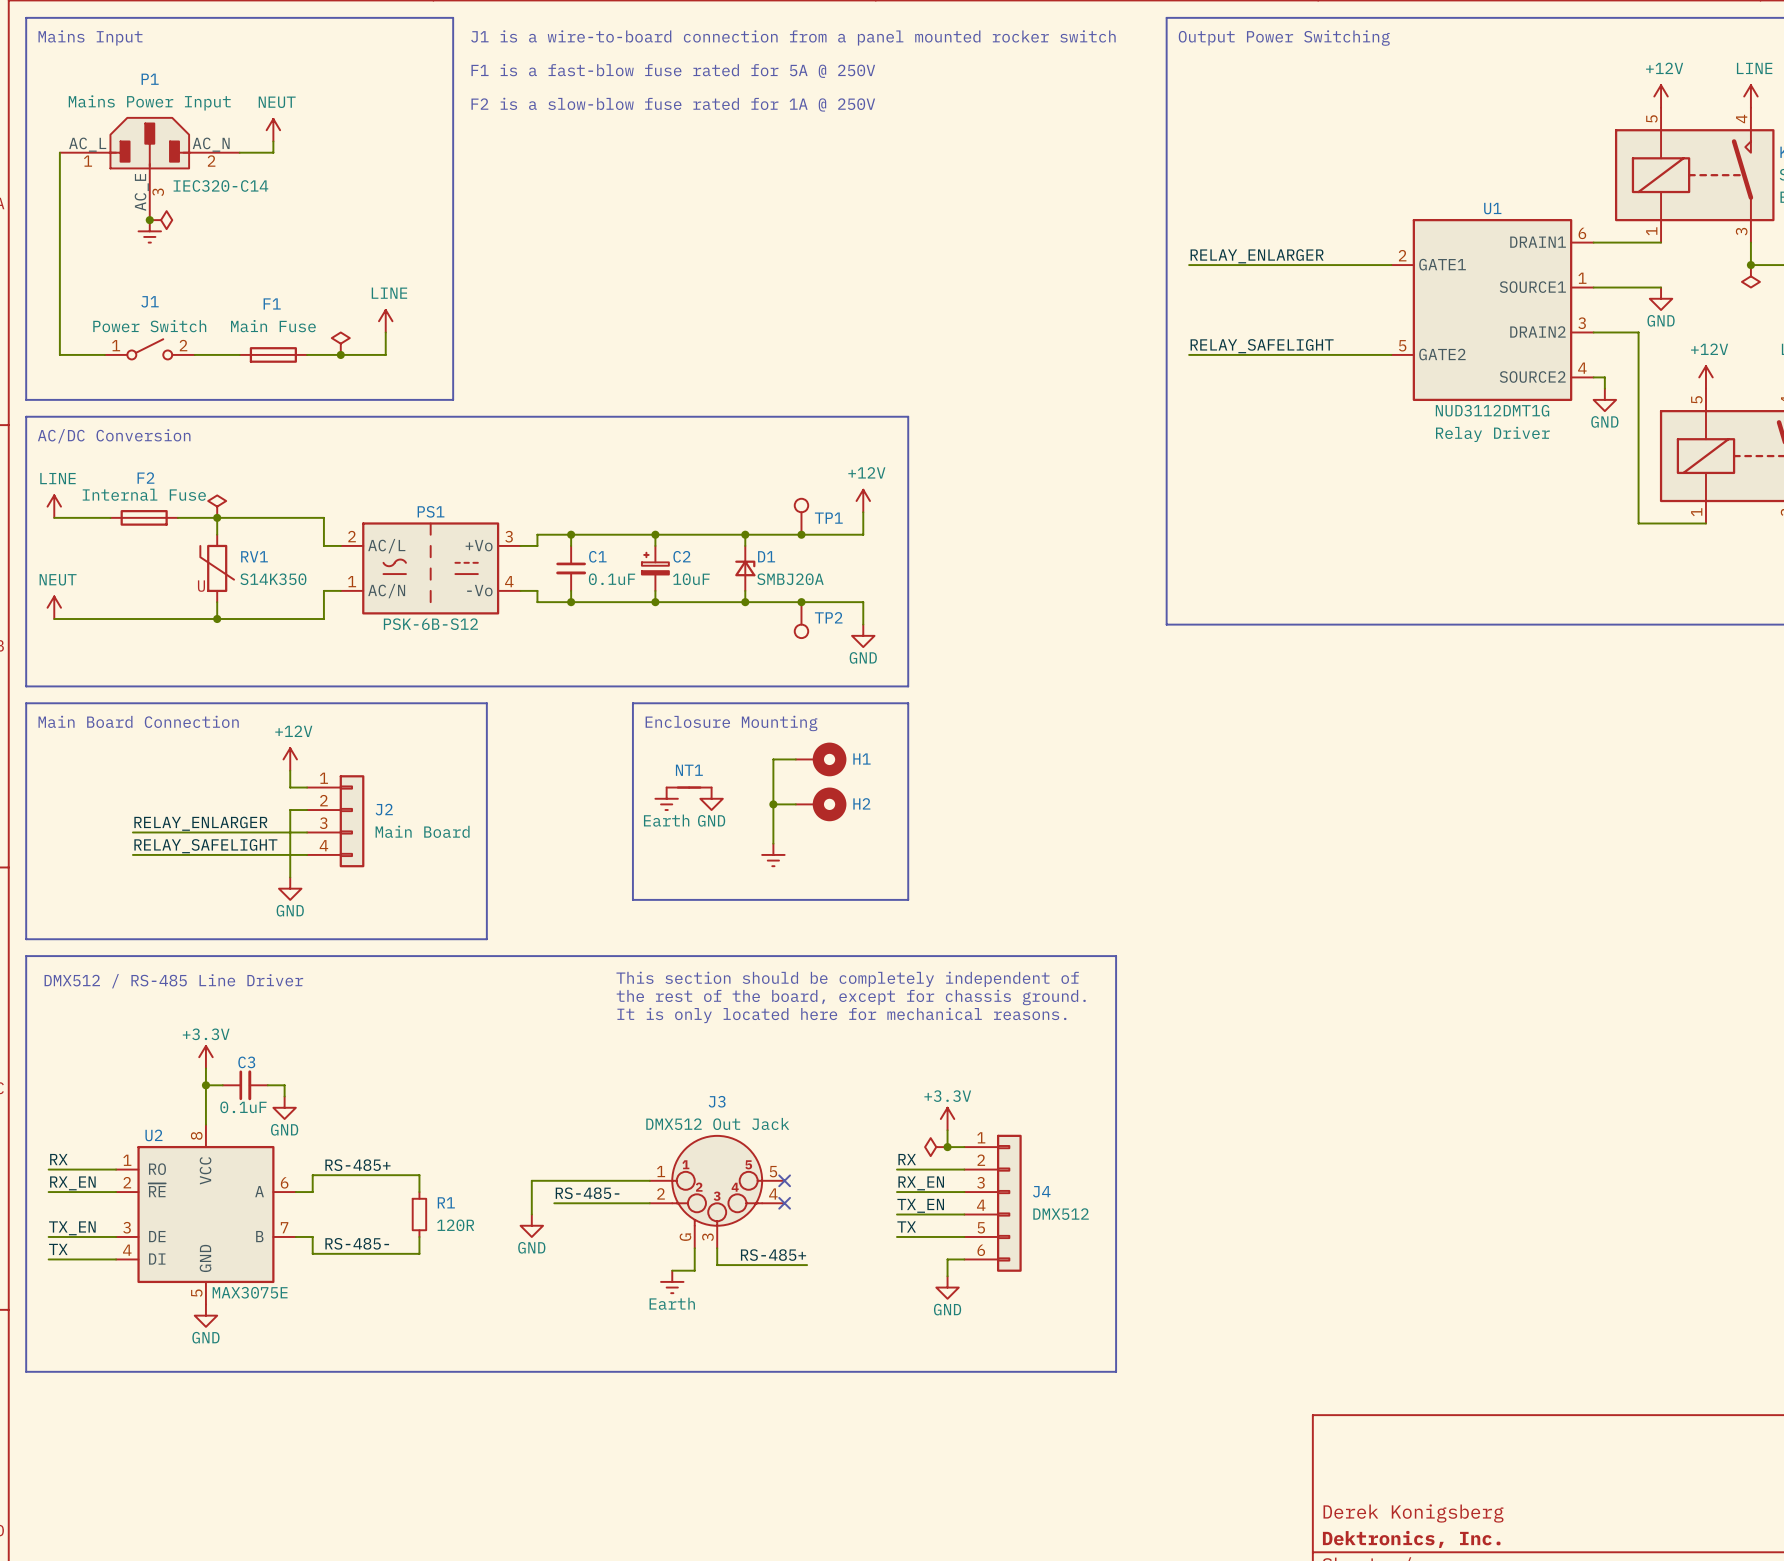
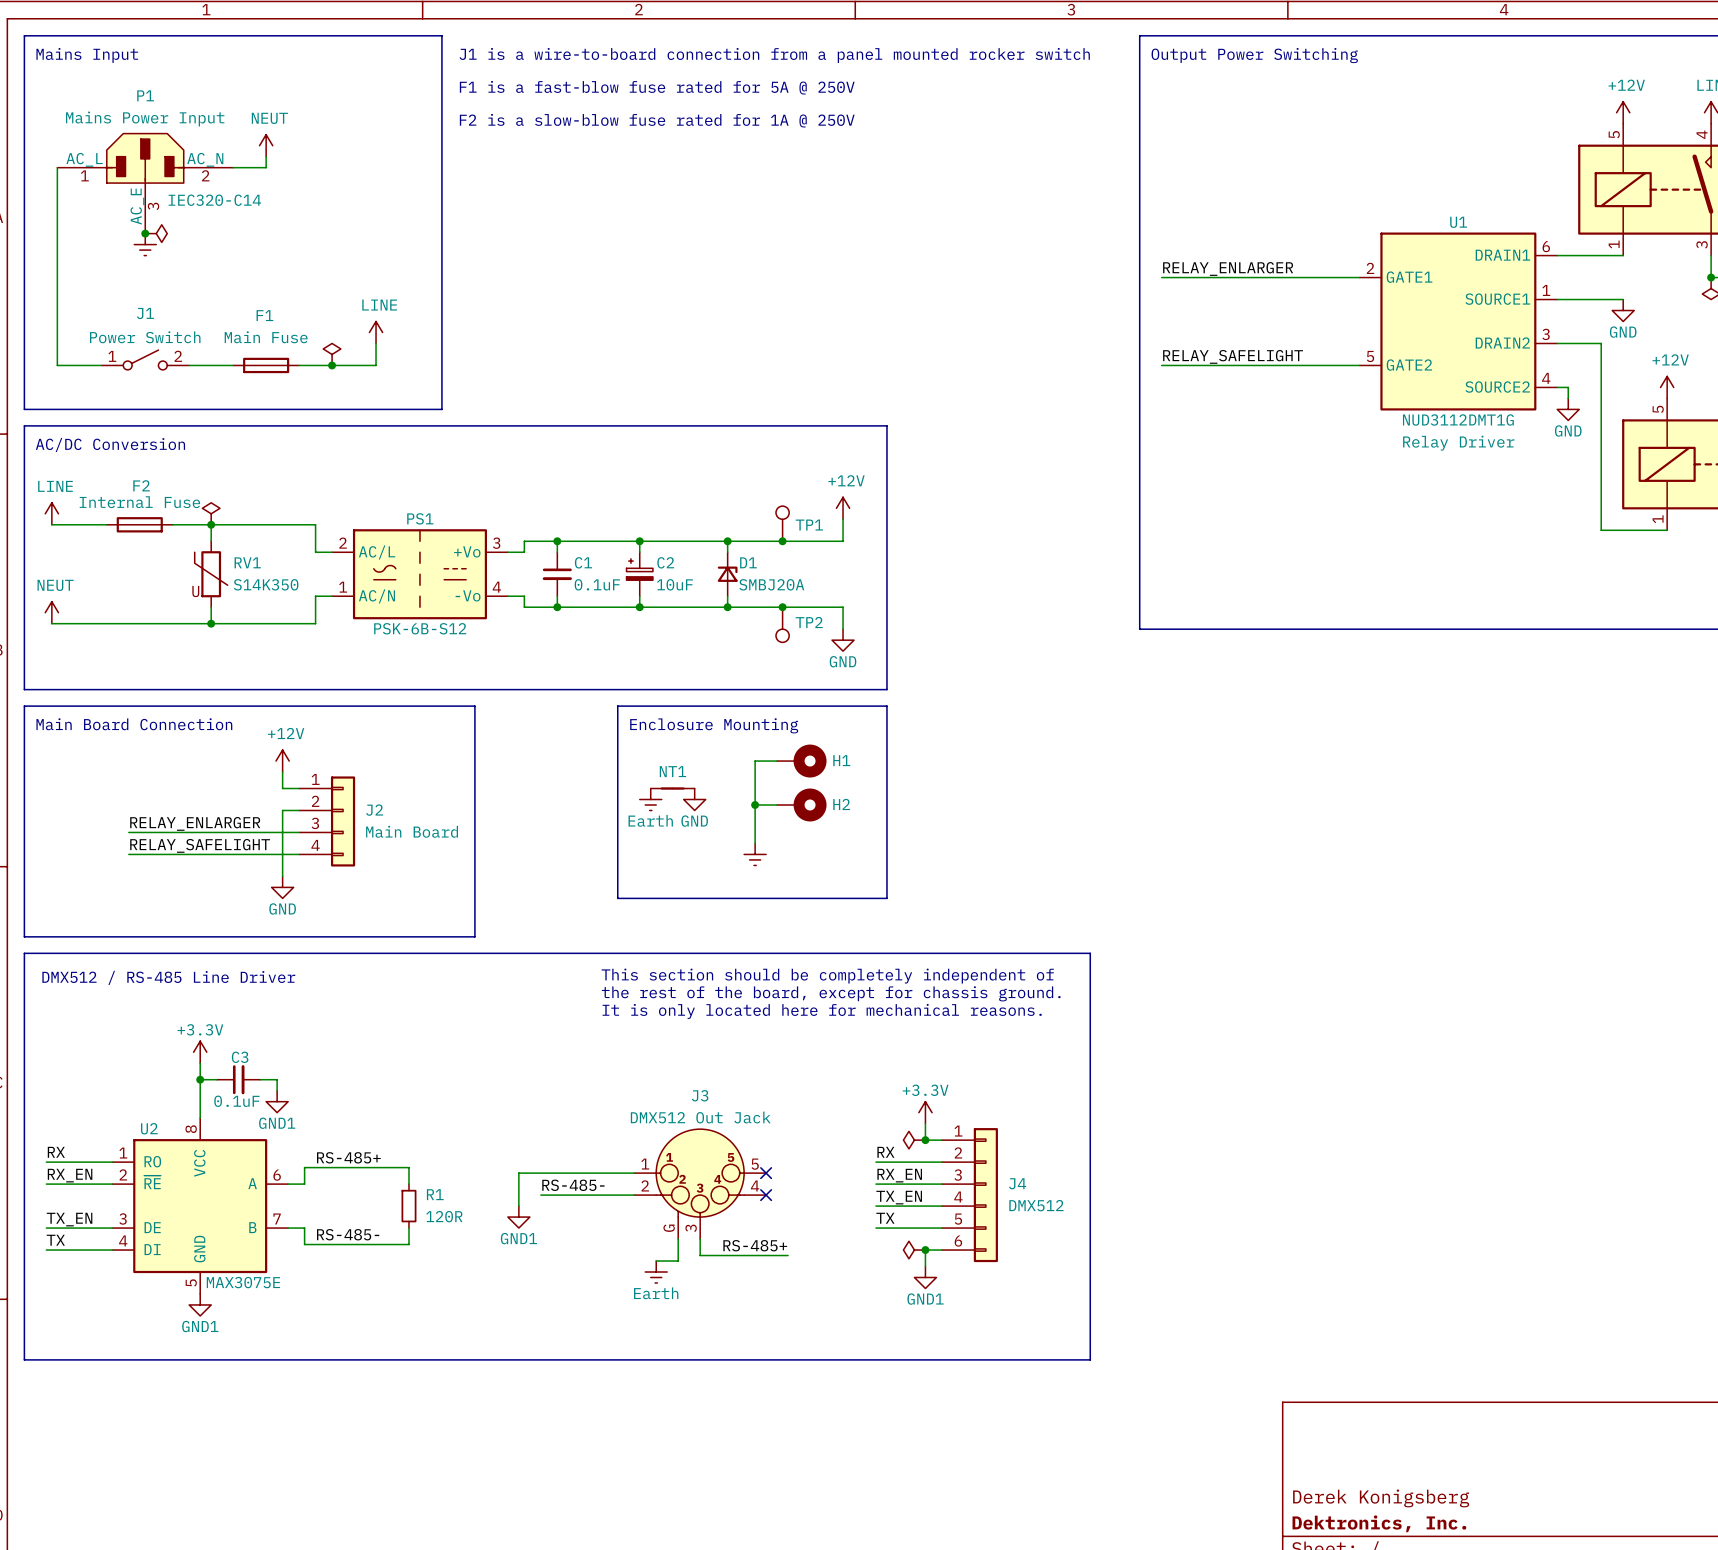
power symbol: GND (284, 1107) -> GND1 (277, 1101)
power symbol: GND (531, 1225) -> GND1 (518, 1217)
power symbol: none -> (914, 1250)
junction: none -> (925, 1250)
power symbol: GND (947, 1287) -> GND1 (925, 1277)
power symbol: GND (205, 1315) -> GND1 (200, 1304)

